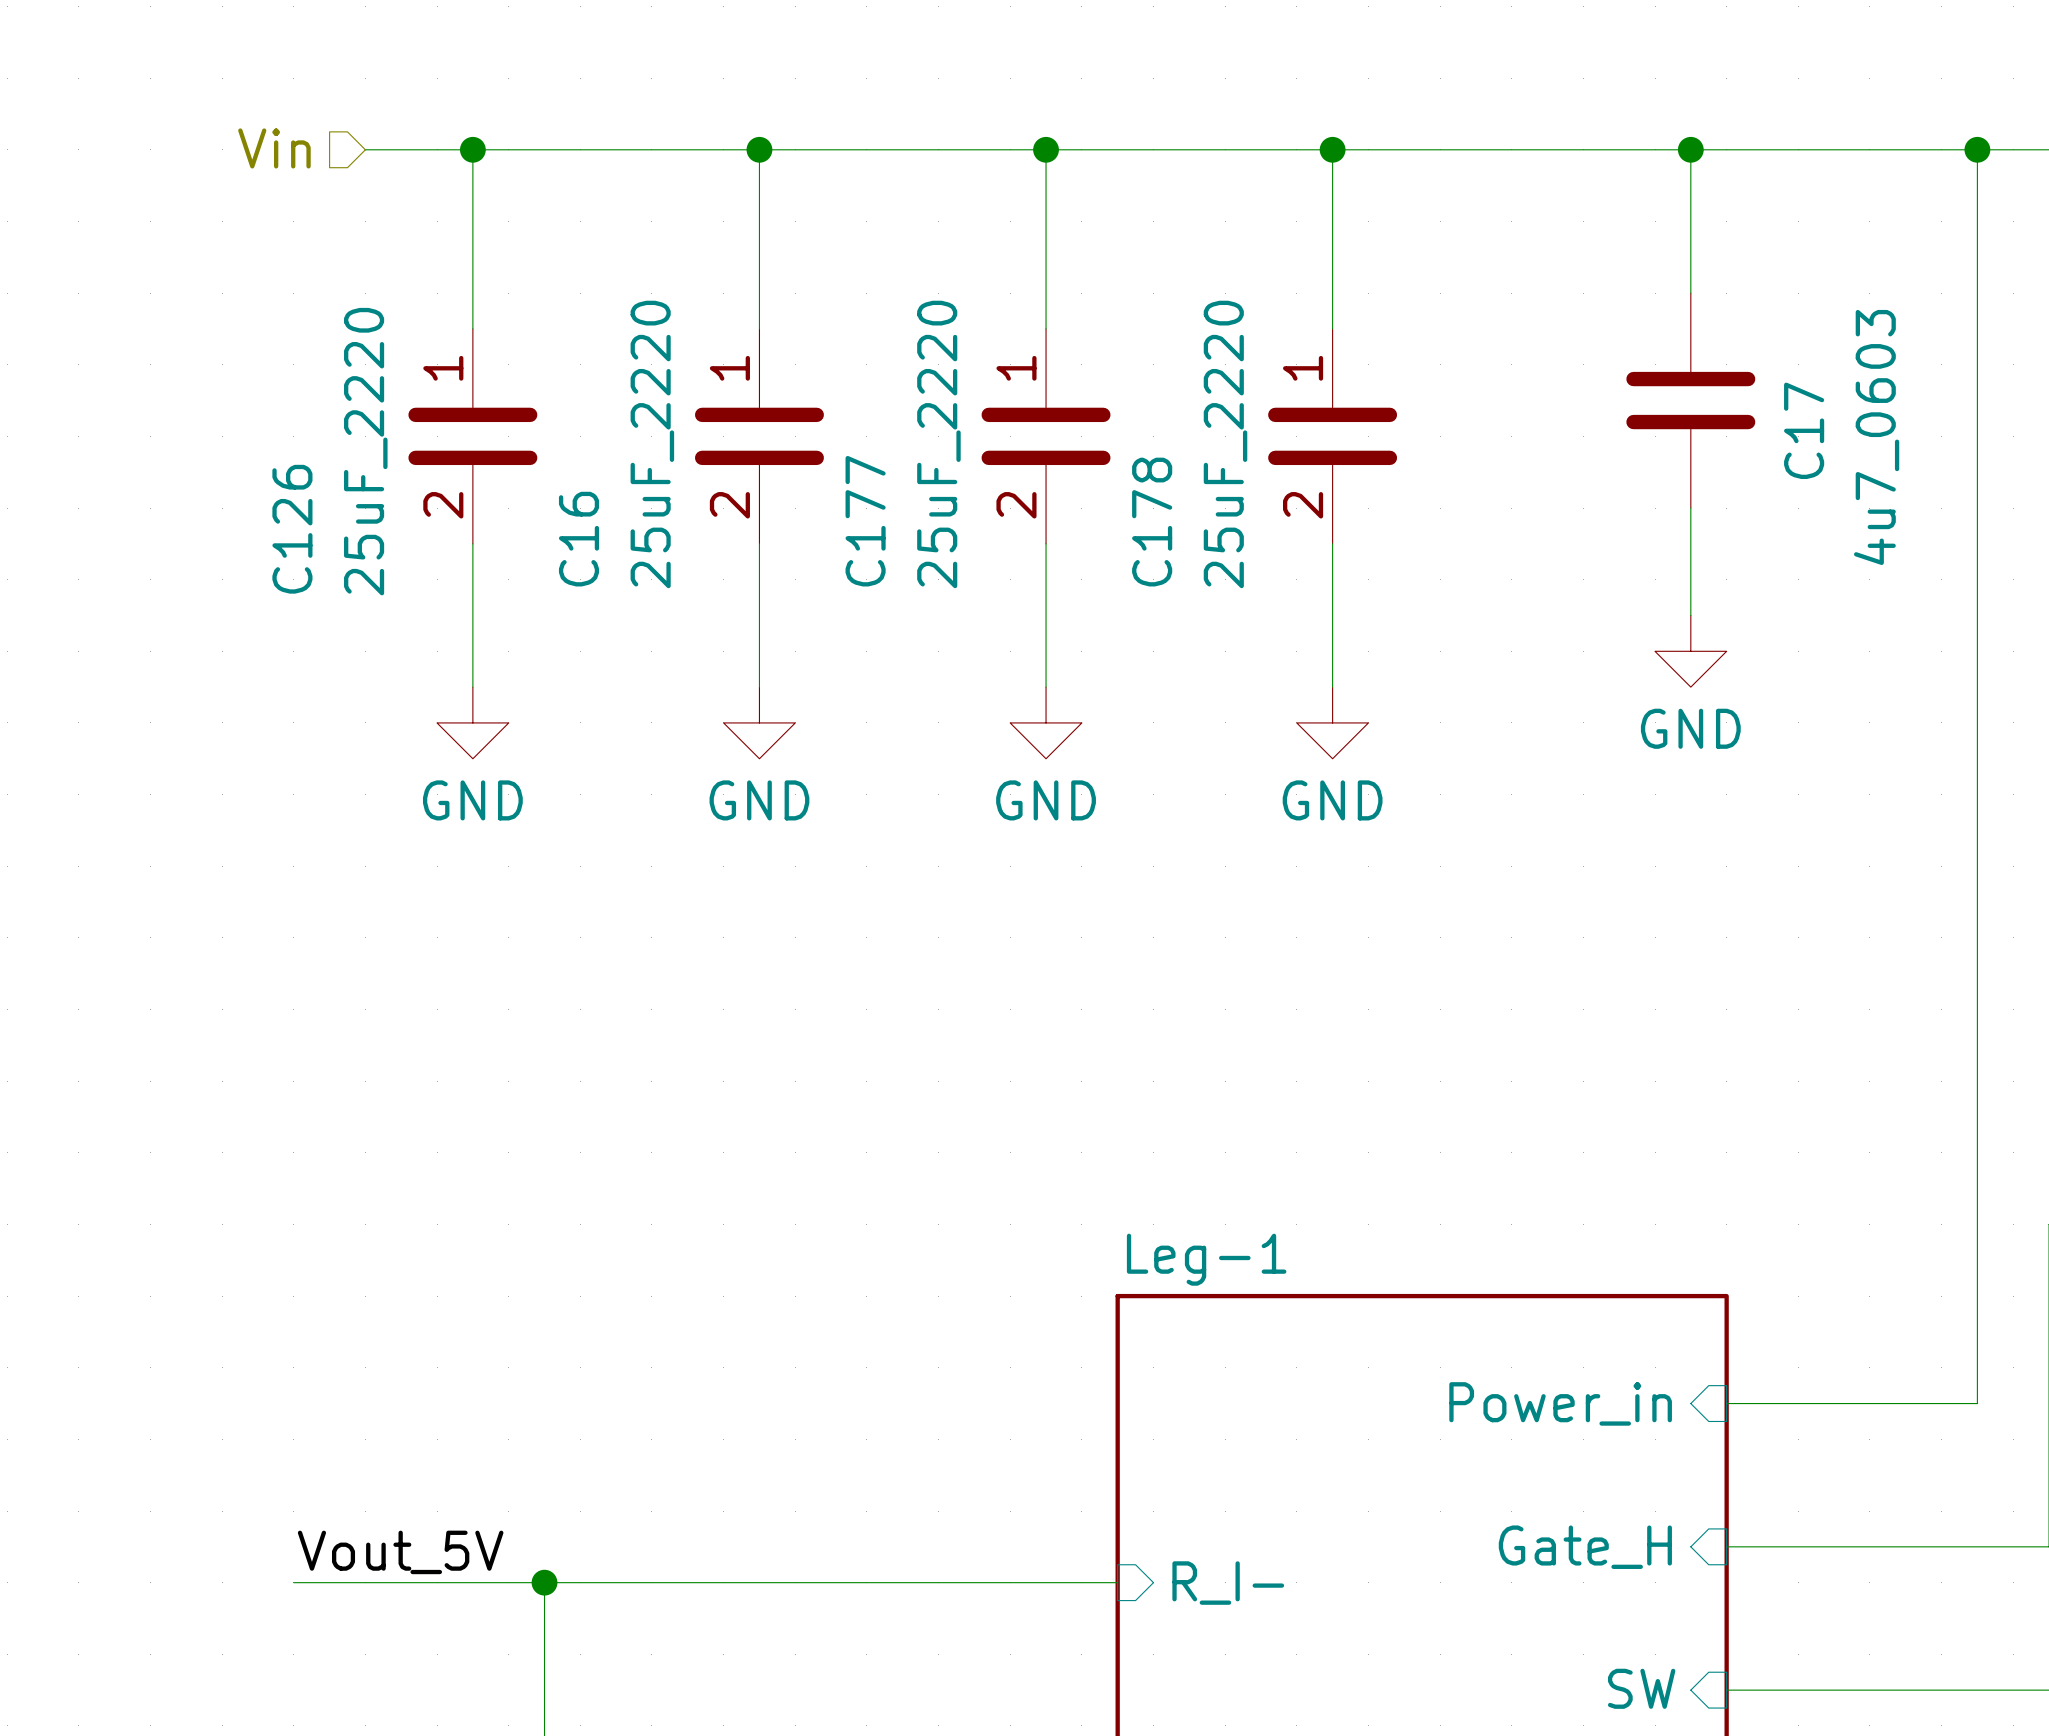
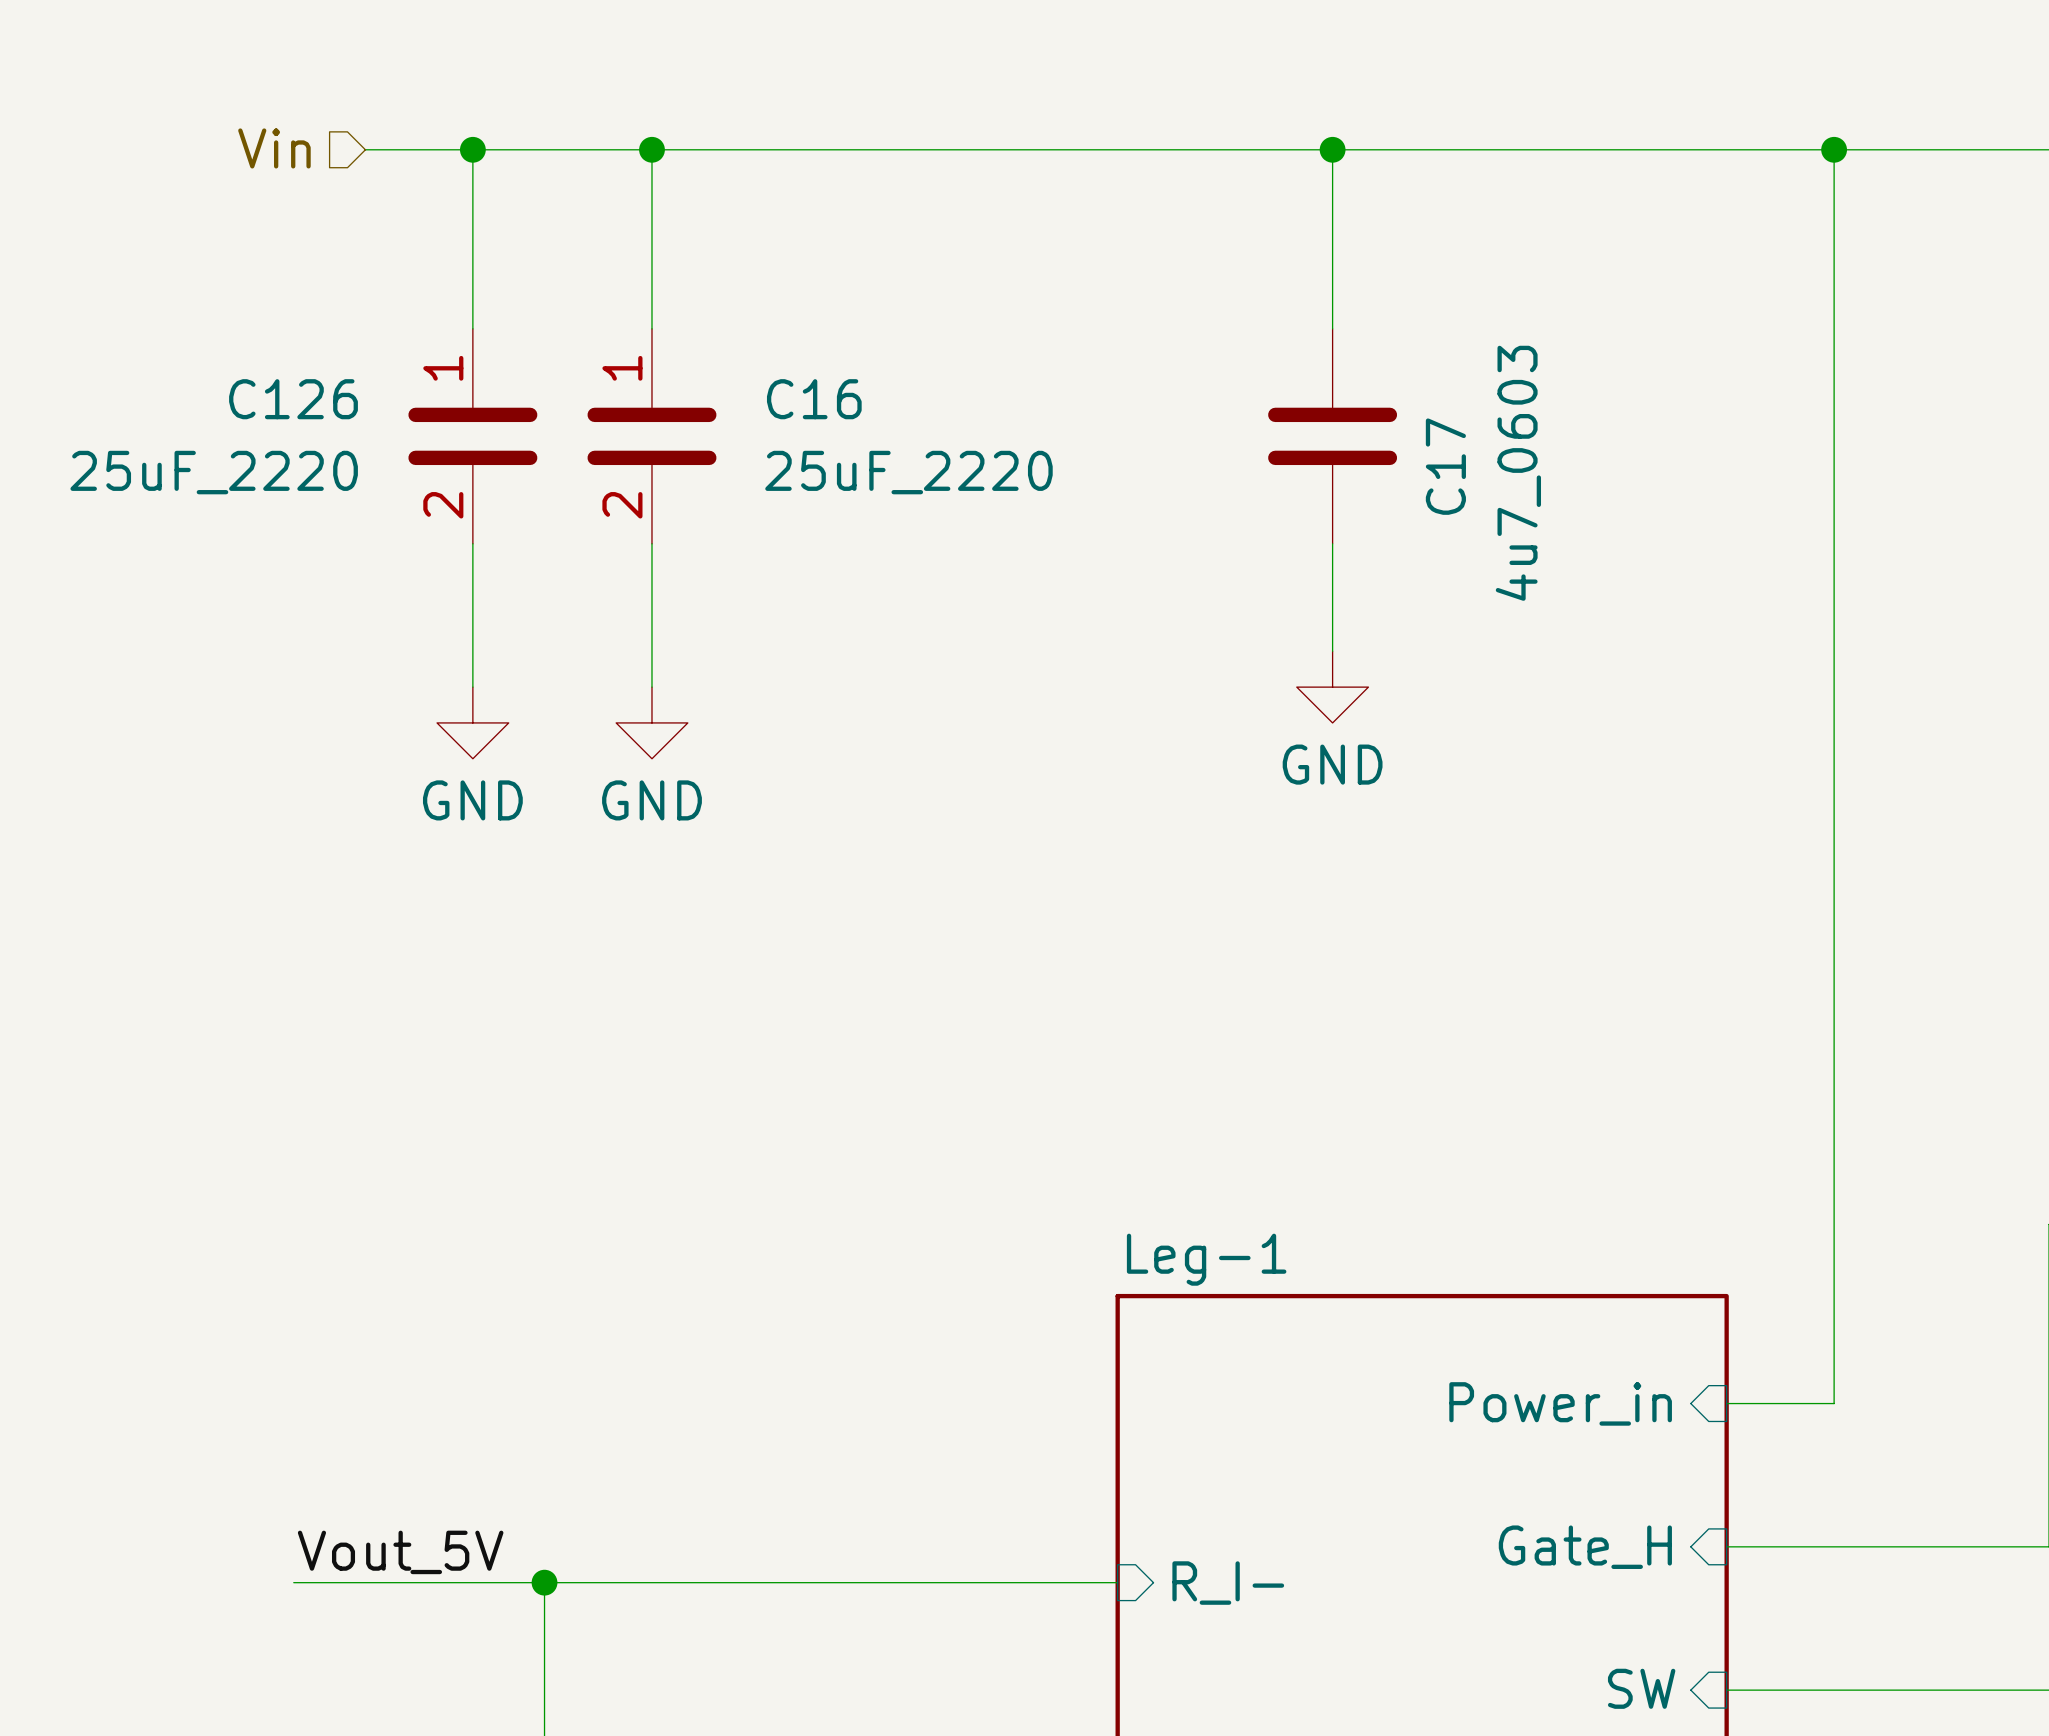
wire: (759, 149) (759, 328) -> (651, 149) (651, 328)
junction position: (759, 149) -> (651, 149)
wire: (1046, 149) (1046, 328) -> none
junction: (1046, 149) -> none
wire: (1690, 149) (1690, 293) -> none
junction: (1690, 149) -> none
junction: none -> (1834, 149)
wire: (1977, 149) (1977, 1403) (1834, 1403) -> (1834, 149) (1834, 1403)
junction: (1977, 149) -> none
C17 position: (1690, 400) -> (1332, 436)
C16 position: (759, 436) -> (651, 436)
C177: 25uF_2220 (1046, 436) -> none
C178: 25uF_2220 (1332, 436) -> none
C16 value rotation: 0° (652, 444) -> 90° clockwise (908, 472)
C126 value rotation: 0° (365, 451) -> 90° clockwise (214, 472)
wire: (1690, 508) (1690, 615) -> none
C126 name rotation: 0° (292, 529) -> 90° clockwise (293, 399)
C16 name rotation: 0° (579, 539) -> 90° clockwise (814, 399)
C16 name position: C16 (579, 539) -> C16 (814, 399)
wire: (759, 543) (759, 687) -> (651, 543) (651, 687)
wire: (1046, 543) (1046, 687) -> none
power symbol: GND (1690, 651) -> none
power symbol position: GND (759, 722) -> GND (651, 722)
power symbol: GND (1046, 722) -> none
power symbol position: GND (1332, 722) -> GND (1332, 687)

